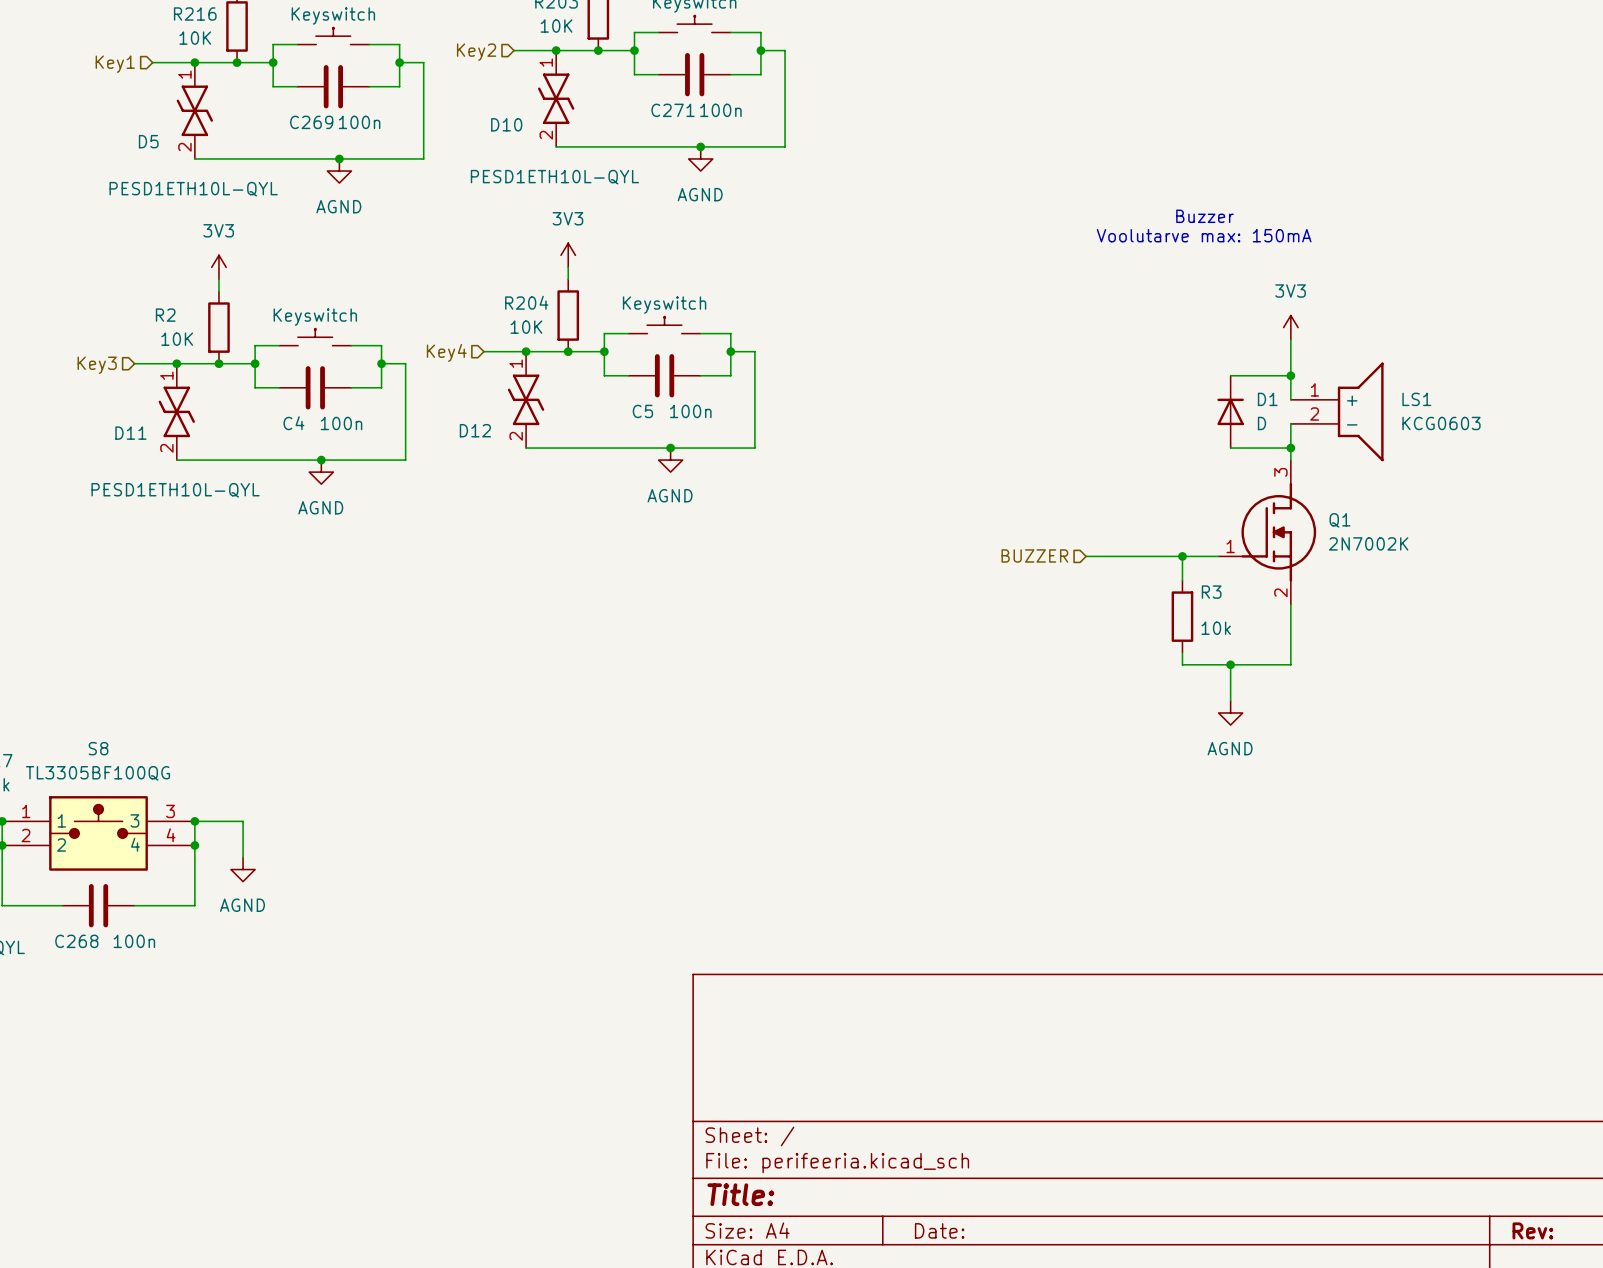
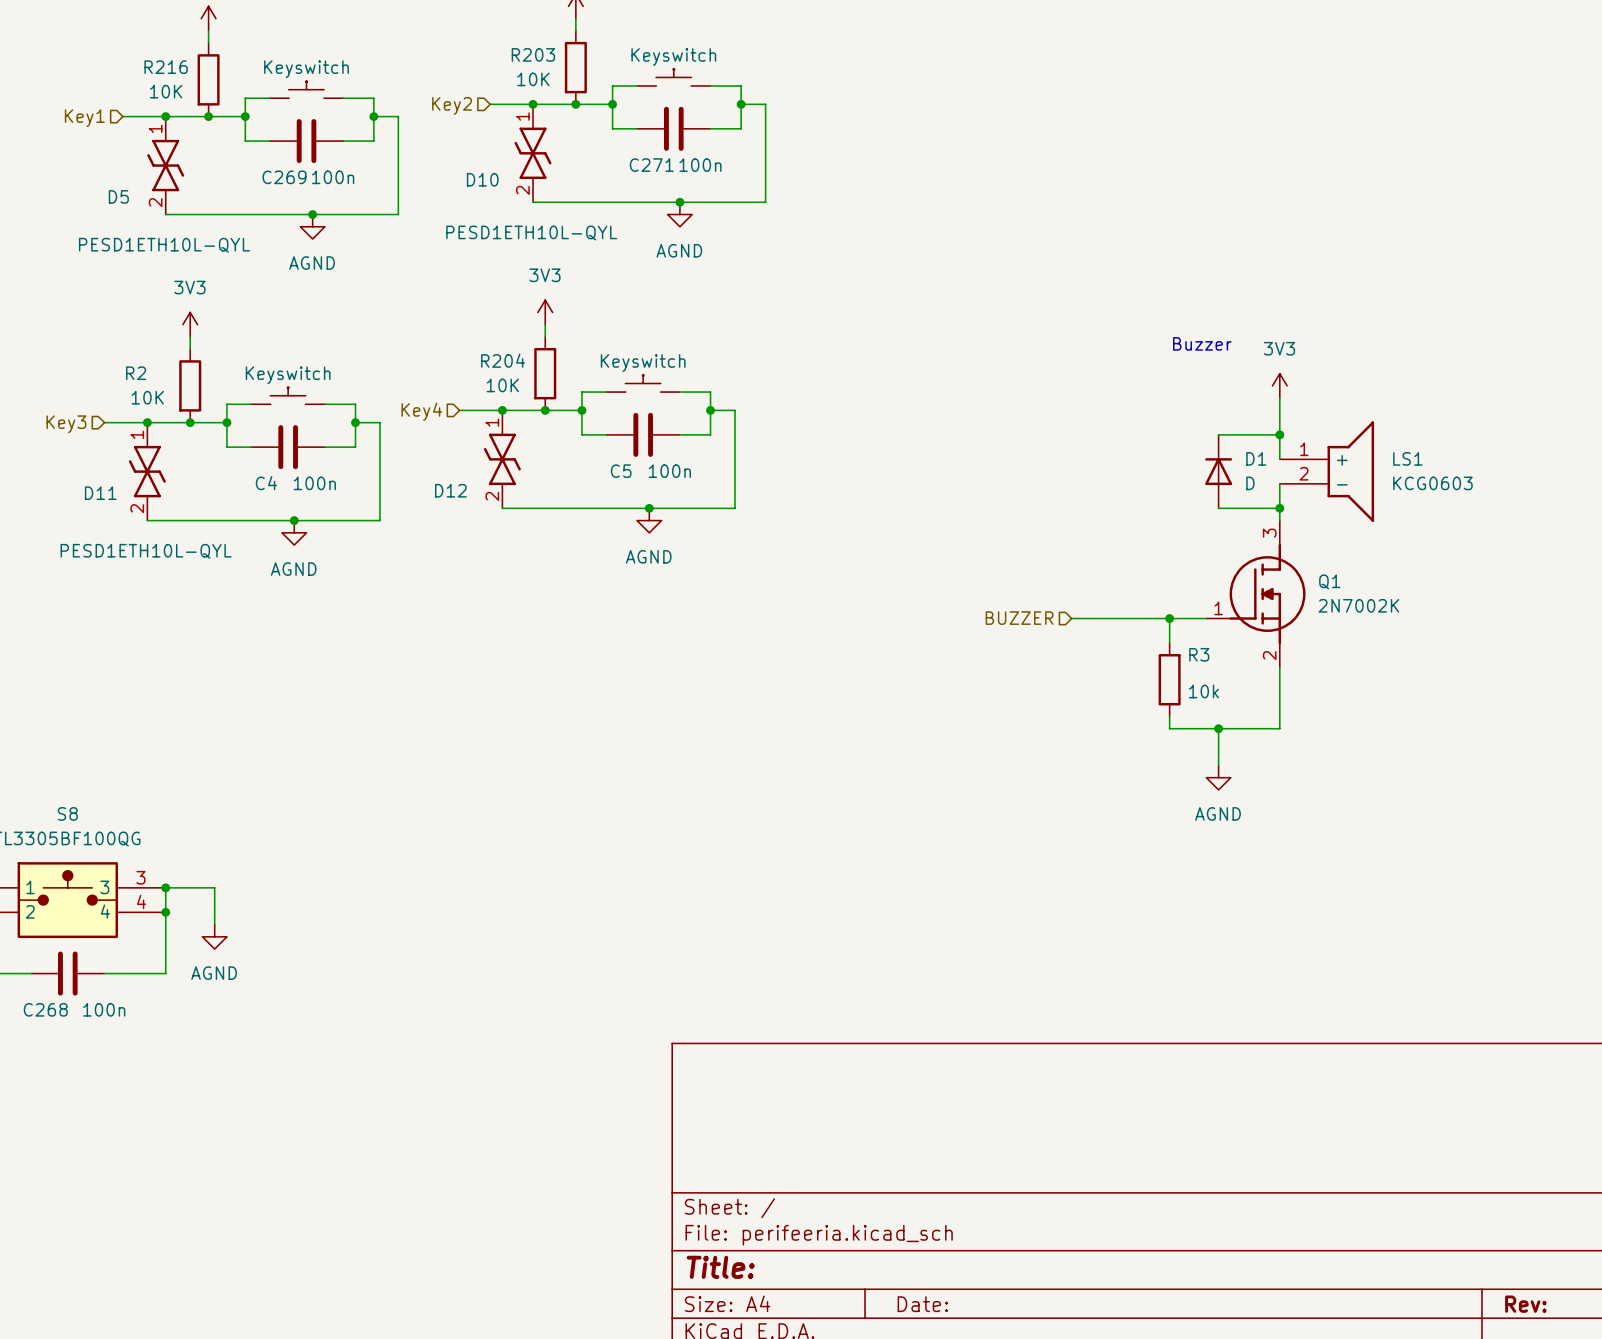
text position: Buzzer (1205, 216) -> Buzzer (1202, 343)
text: Voolutarve max: 150mA (1204, 235) -> none

